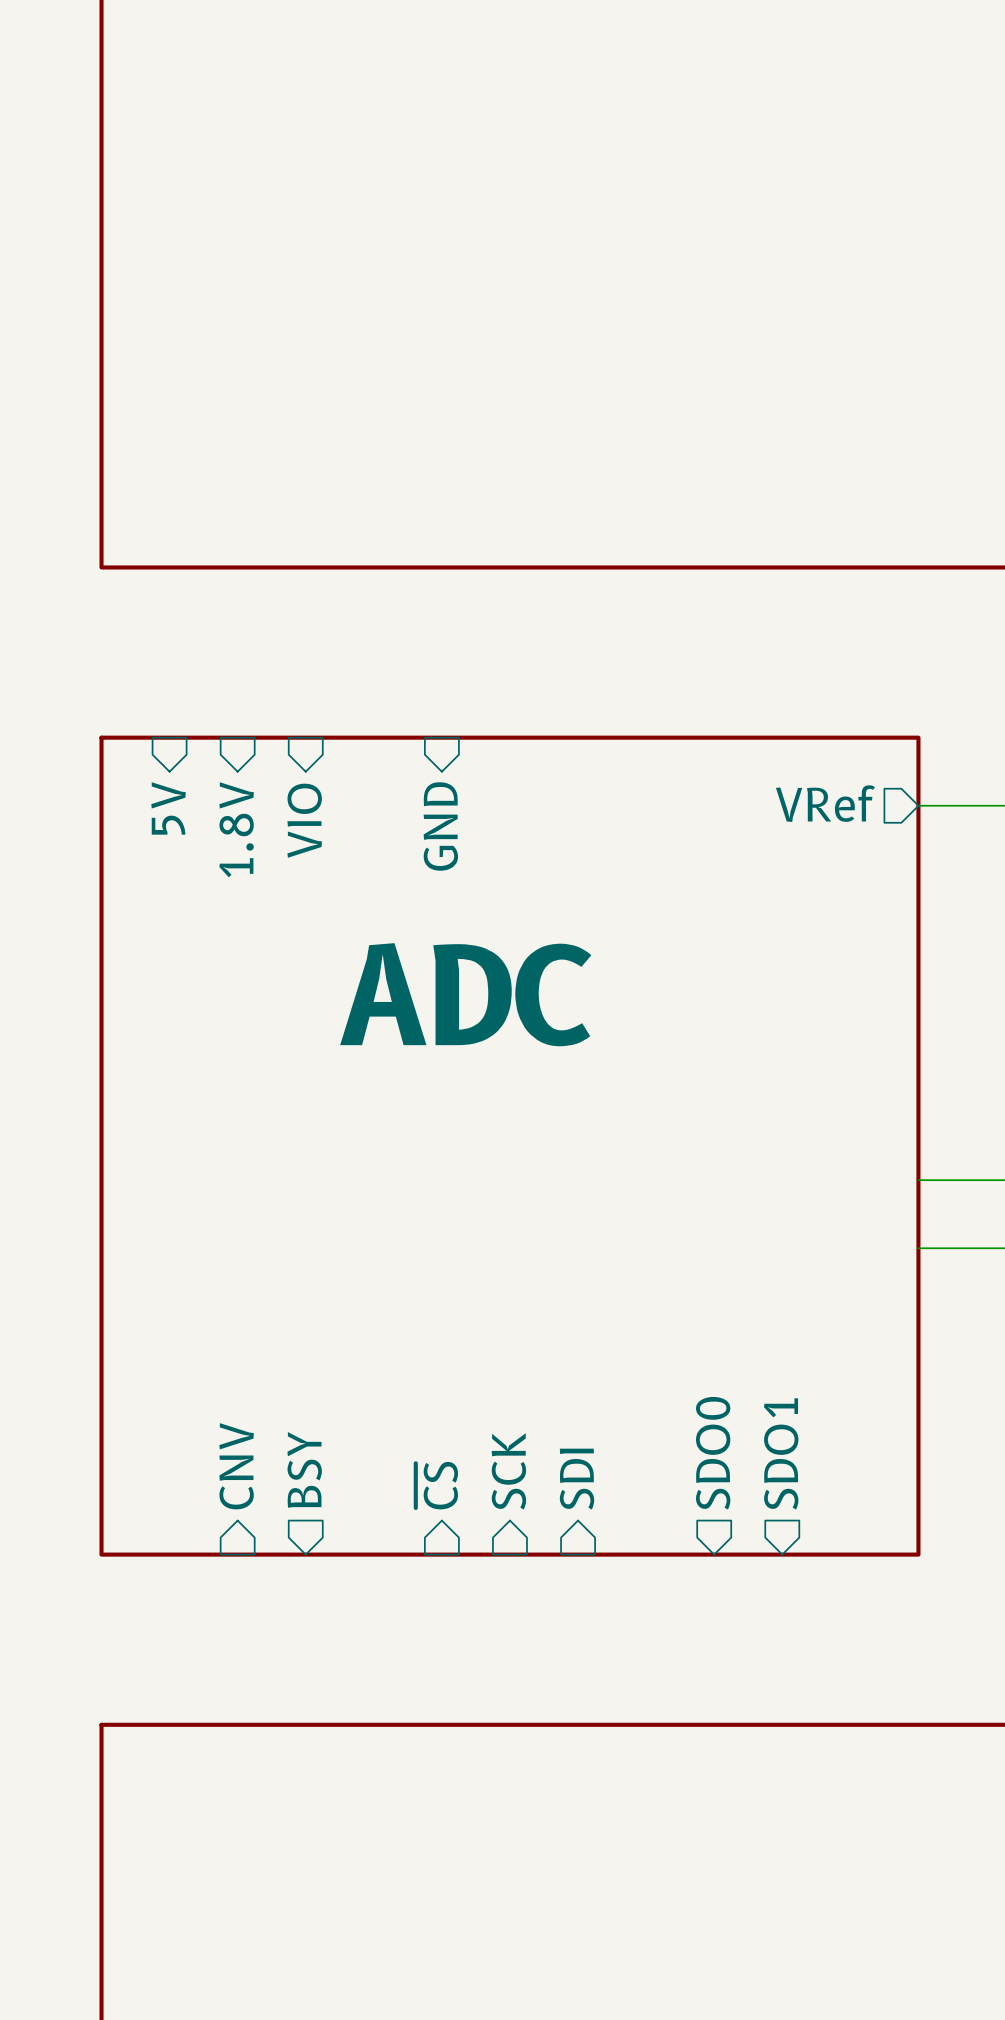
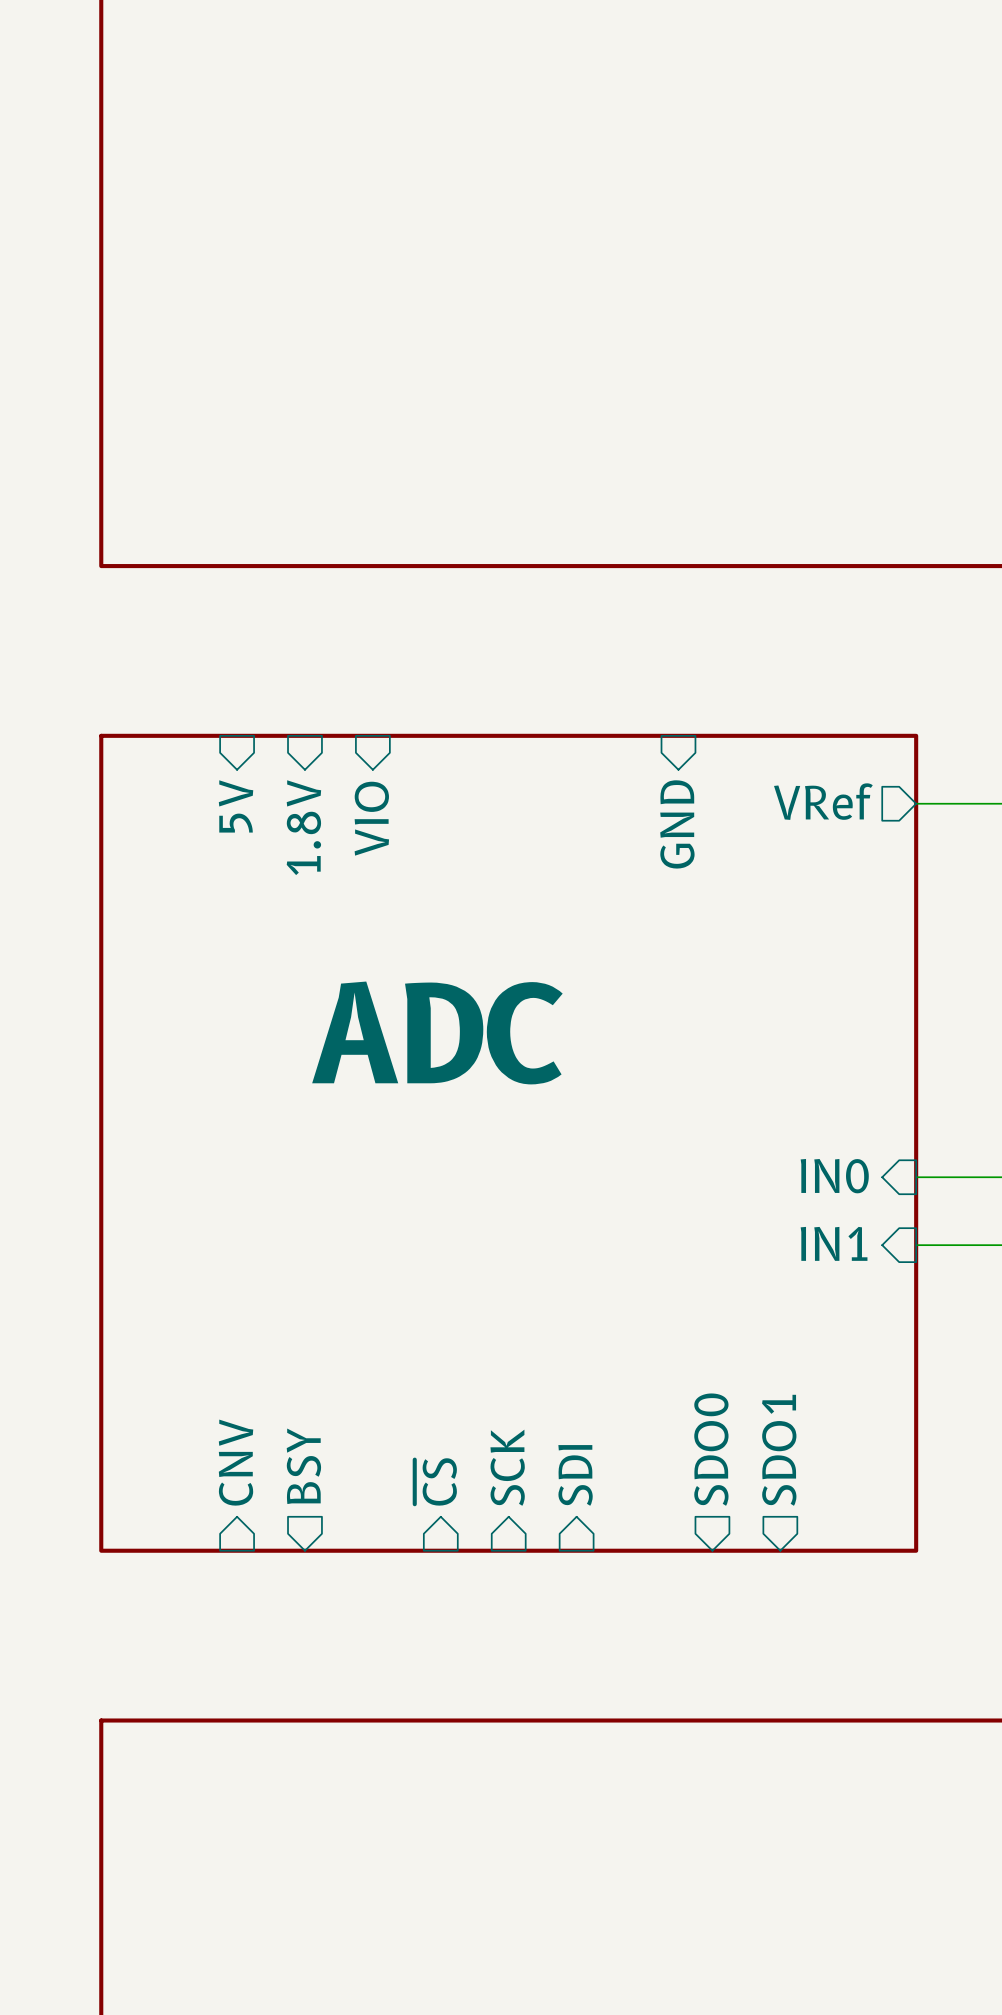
sheet pin: 5V (168, 808) -> none
sheet pin: VIO (304, 820) -> 1.8V (303, 827)
sheet pin: none -> VIO (371, 818)
sheet pin position: GND (440, 826) -> GND (677, 824)
sheet pin: 1.8V (236, 829) -> 5V (236, 806)
sheet ADC name position: ADC (465, 994) -> ADC (437, 1032)
sheet pin: none -> IN0 (834, 1176)
sheet pin: none -> IN1 (834, 1243)

